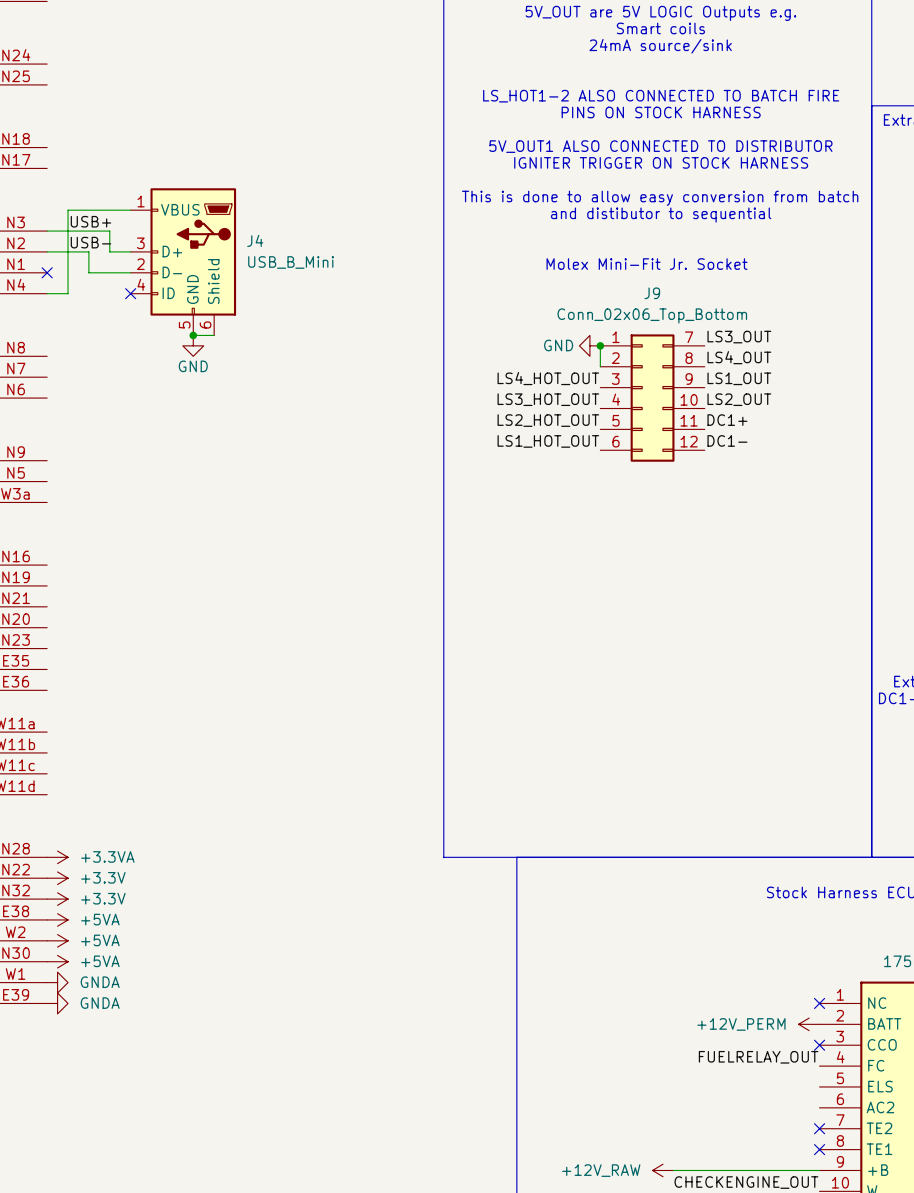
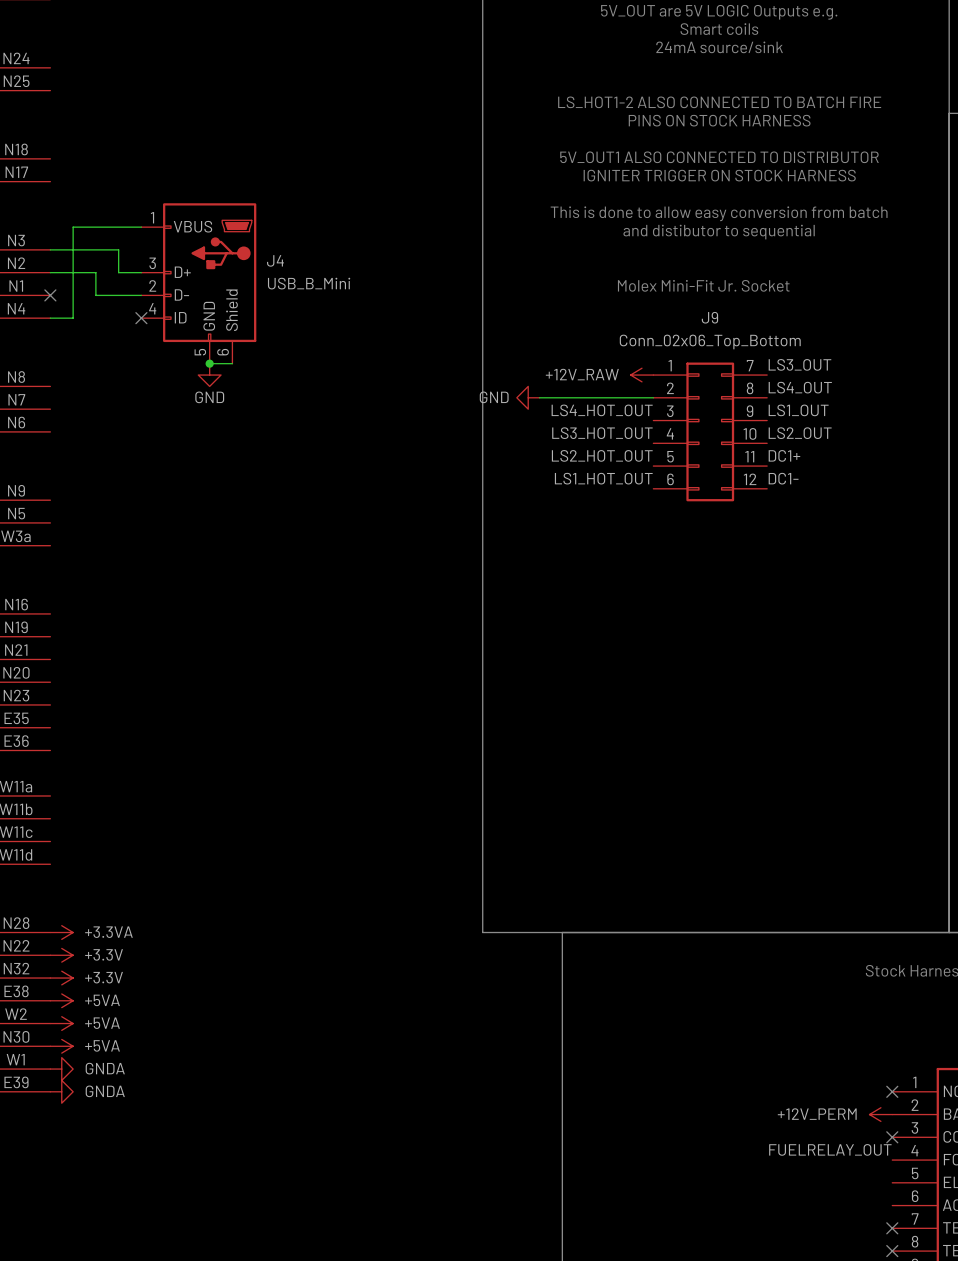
label: USB+ (90, 221) -> none
label: USB- (90, 242) -> none
power symbol: GND (589, 345) -> +12V_RAW (641, 375)
wire: (600, 345) (600, 366) -> (539, 397) (653, 397)
junction: (600, 345) -> none
power symbol: none -> GND (528, 397)

